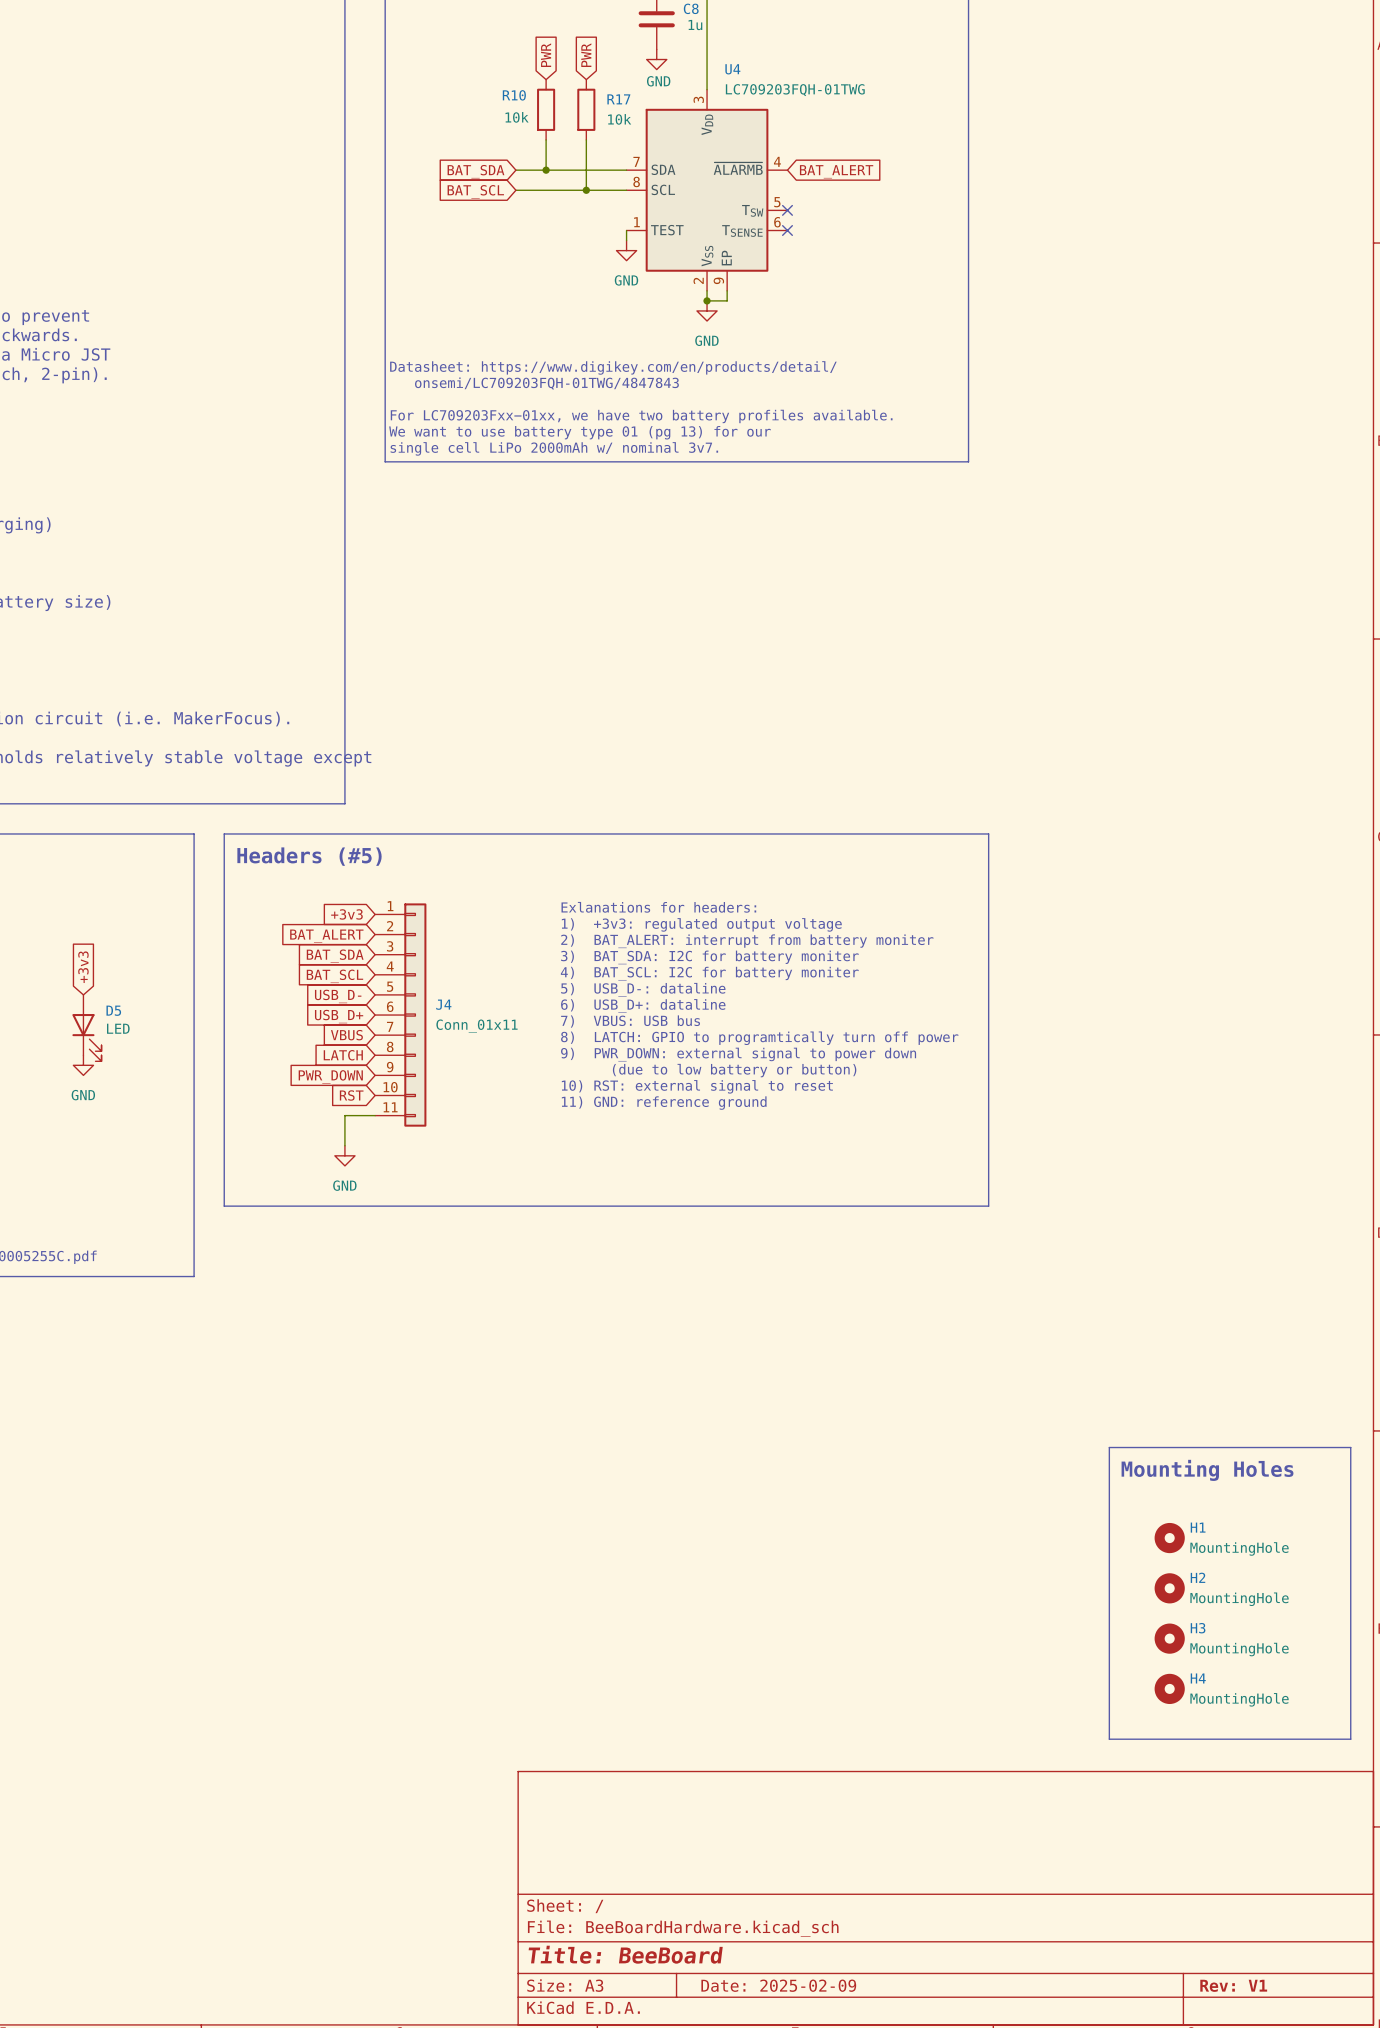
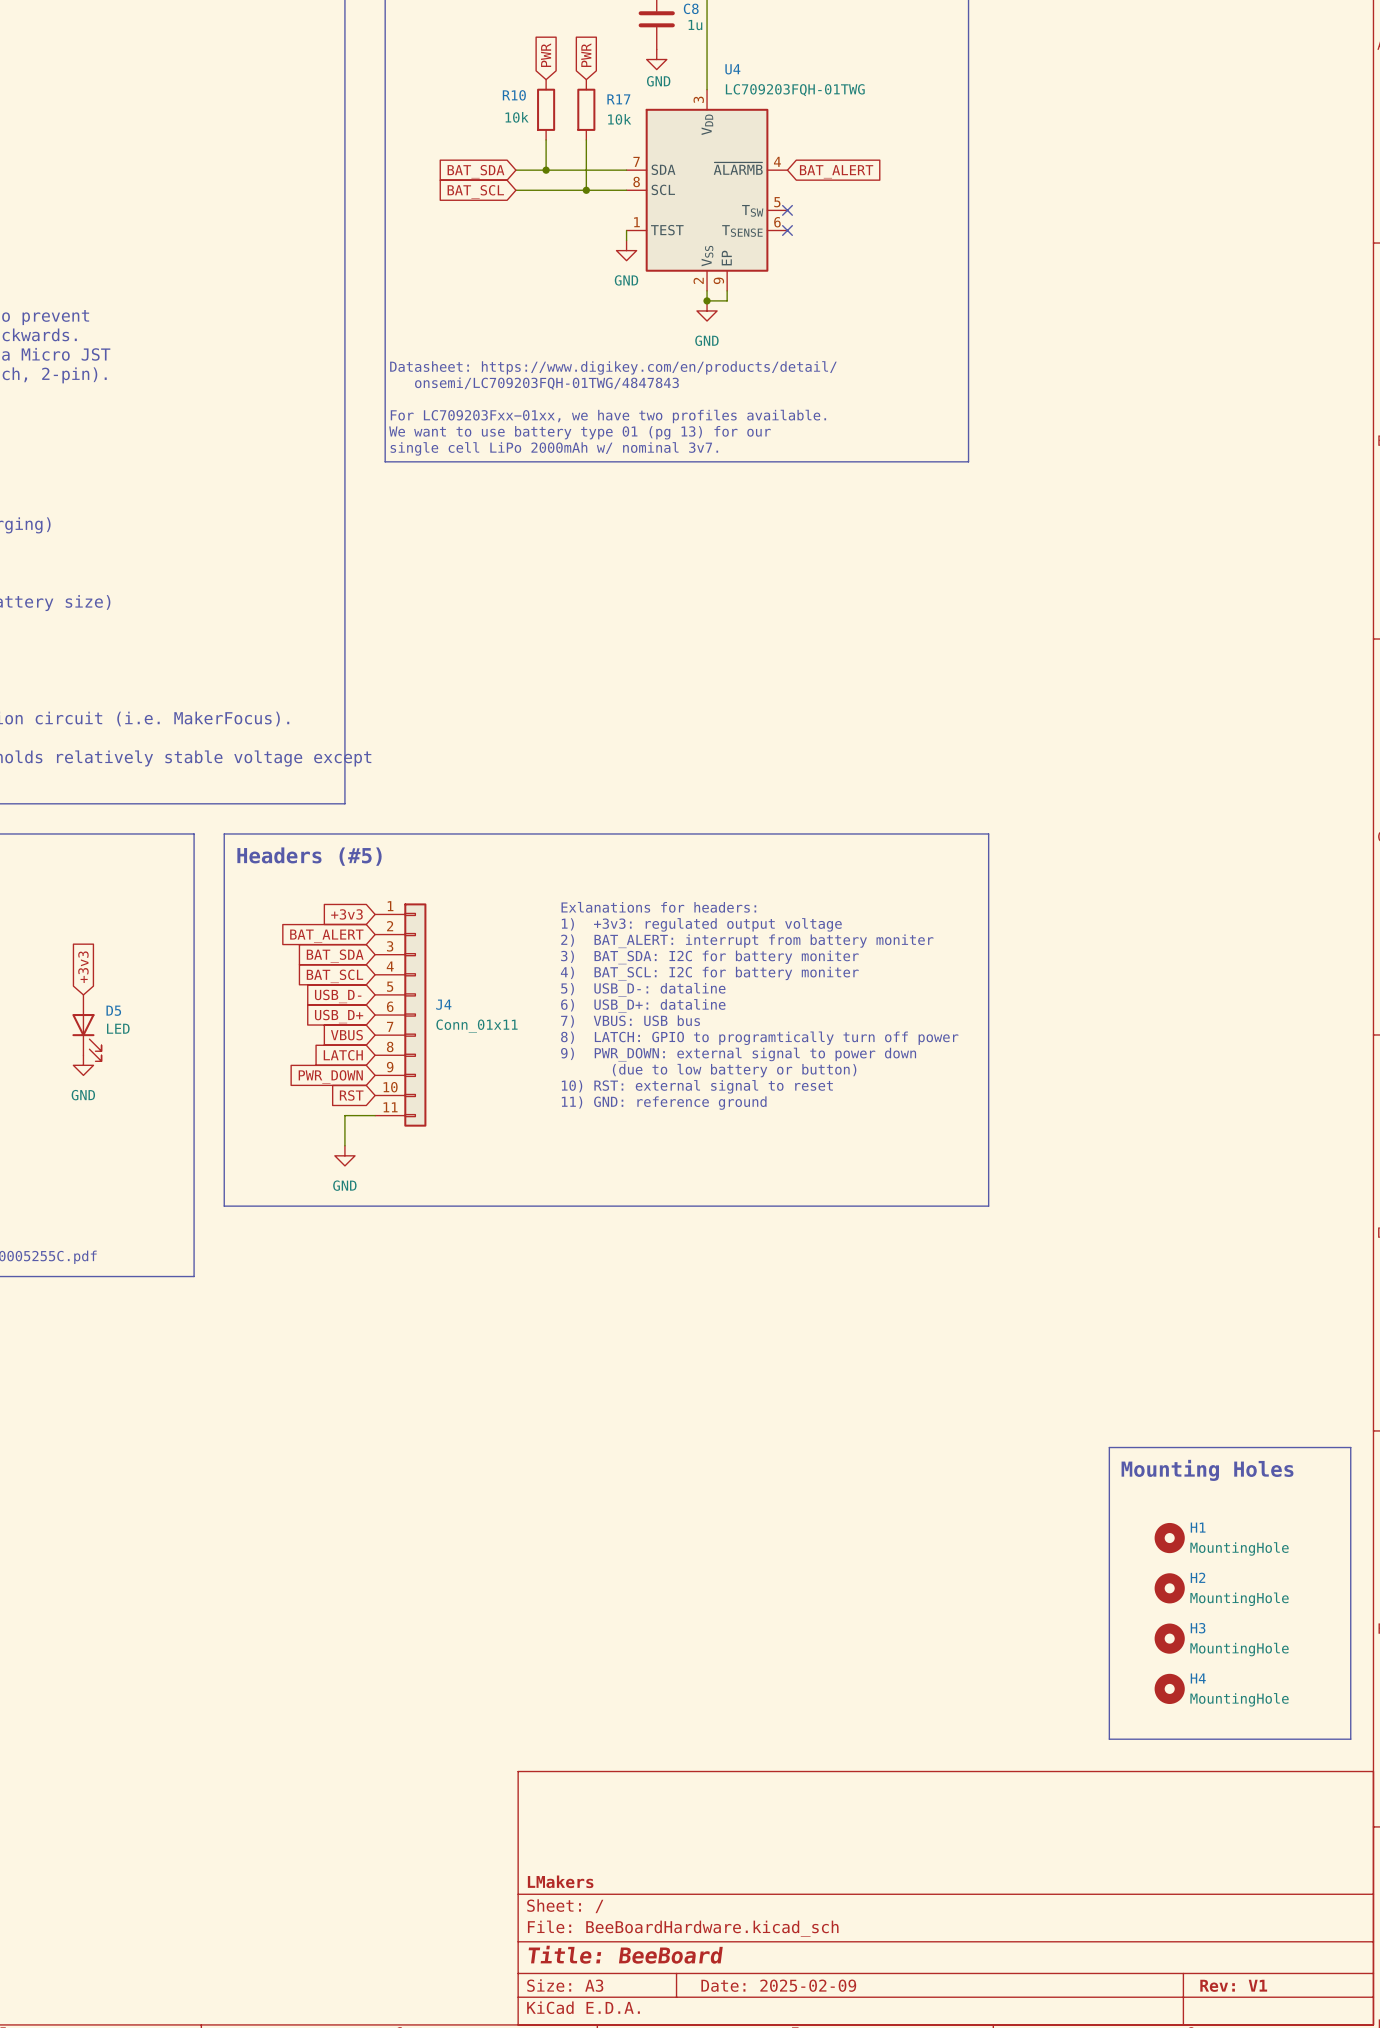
text: For LC709203Fxx−01xx, we have two battery profiles available. (641, 416) -> For LC709203Fxx−01xx, we have two profiles available. (608, 416)
title block: none -> LMakers (560, 1881)

